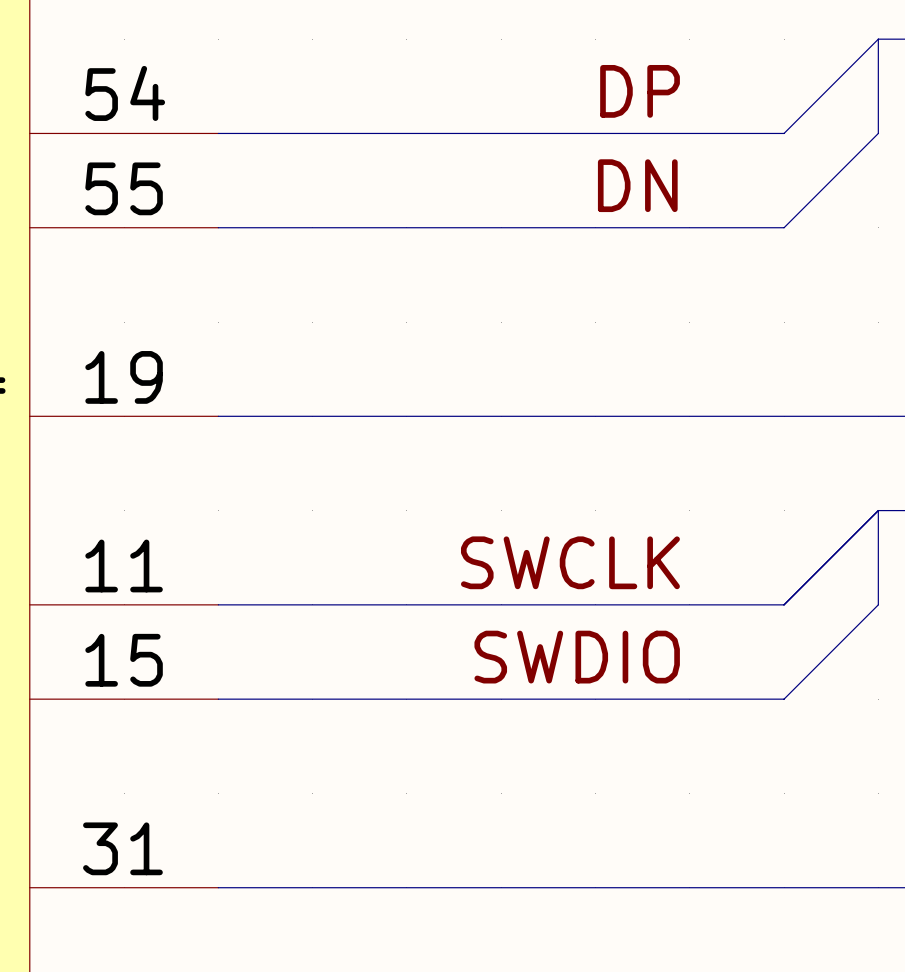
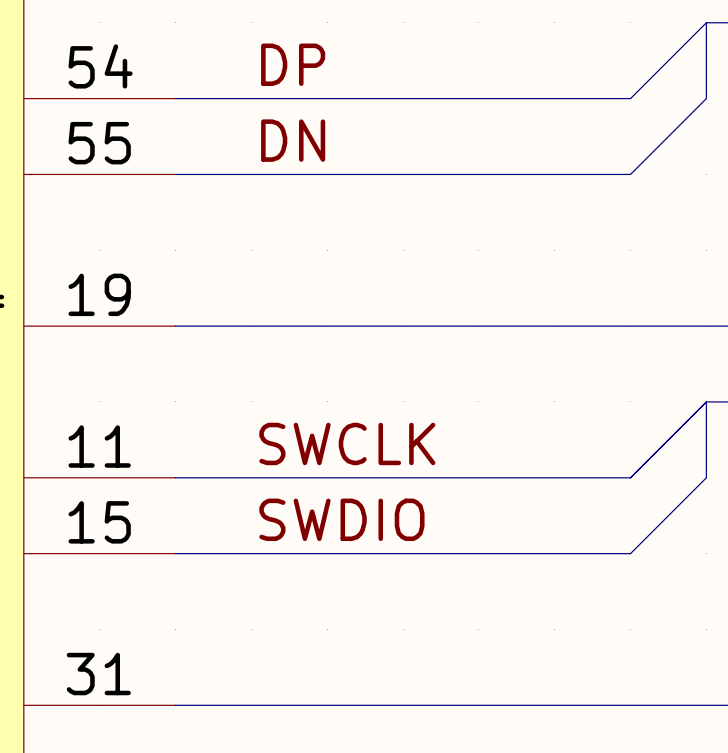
label position: DP (640, 91) -> DP (293, 64)
label position: DN (637, 185) -> DN (293, 140)
label position: SWCLK (570, 562) -> SWCLK (347, 443)
label position: SWDIO (577, 657) -> SWDIO (341, 519)

